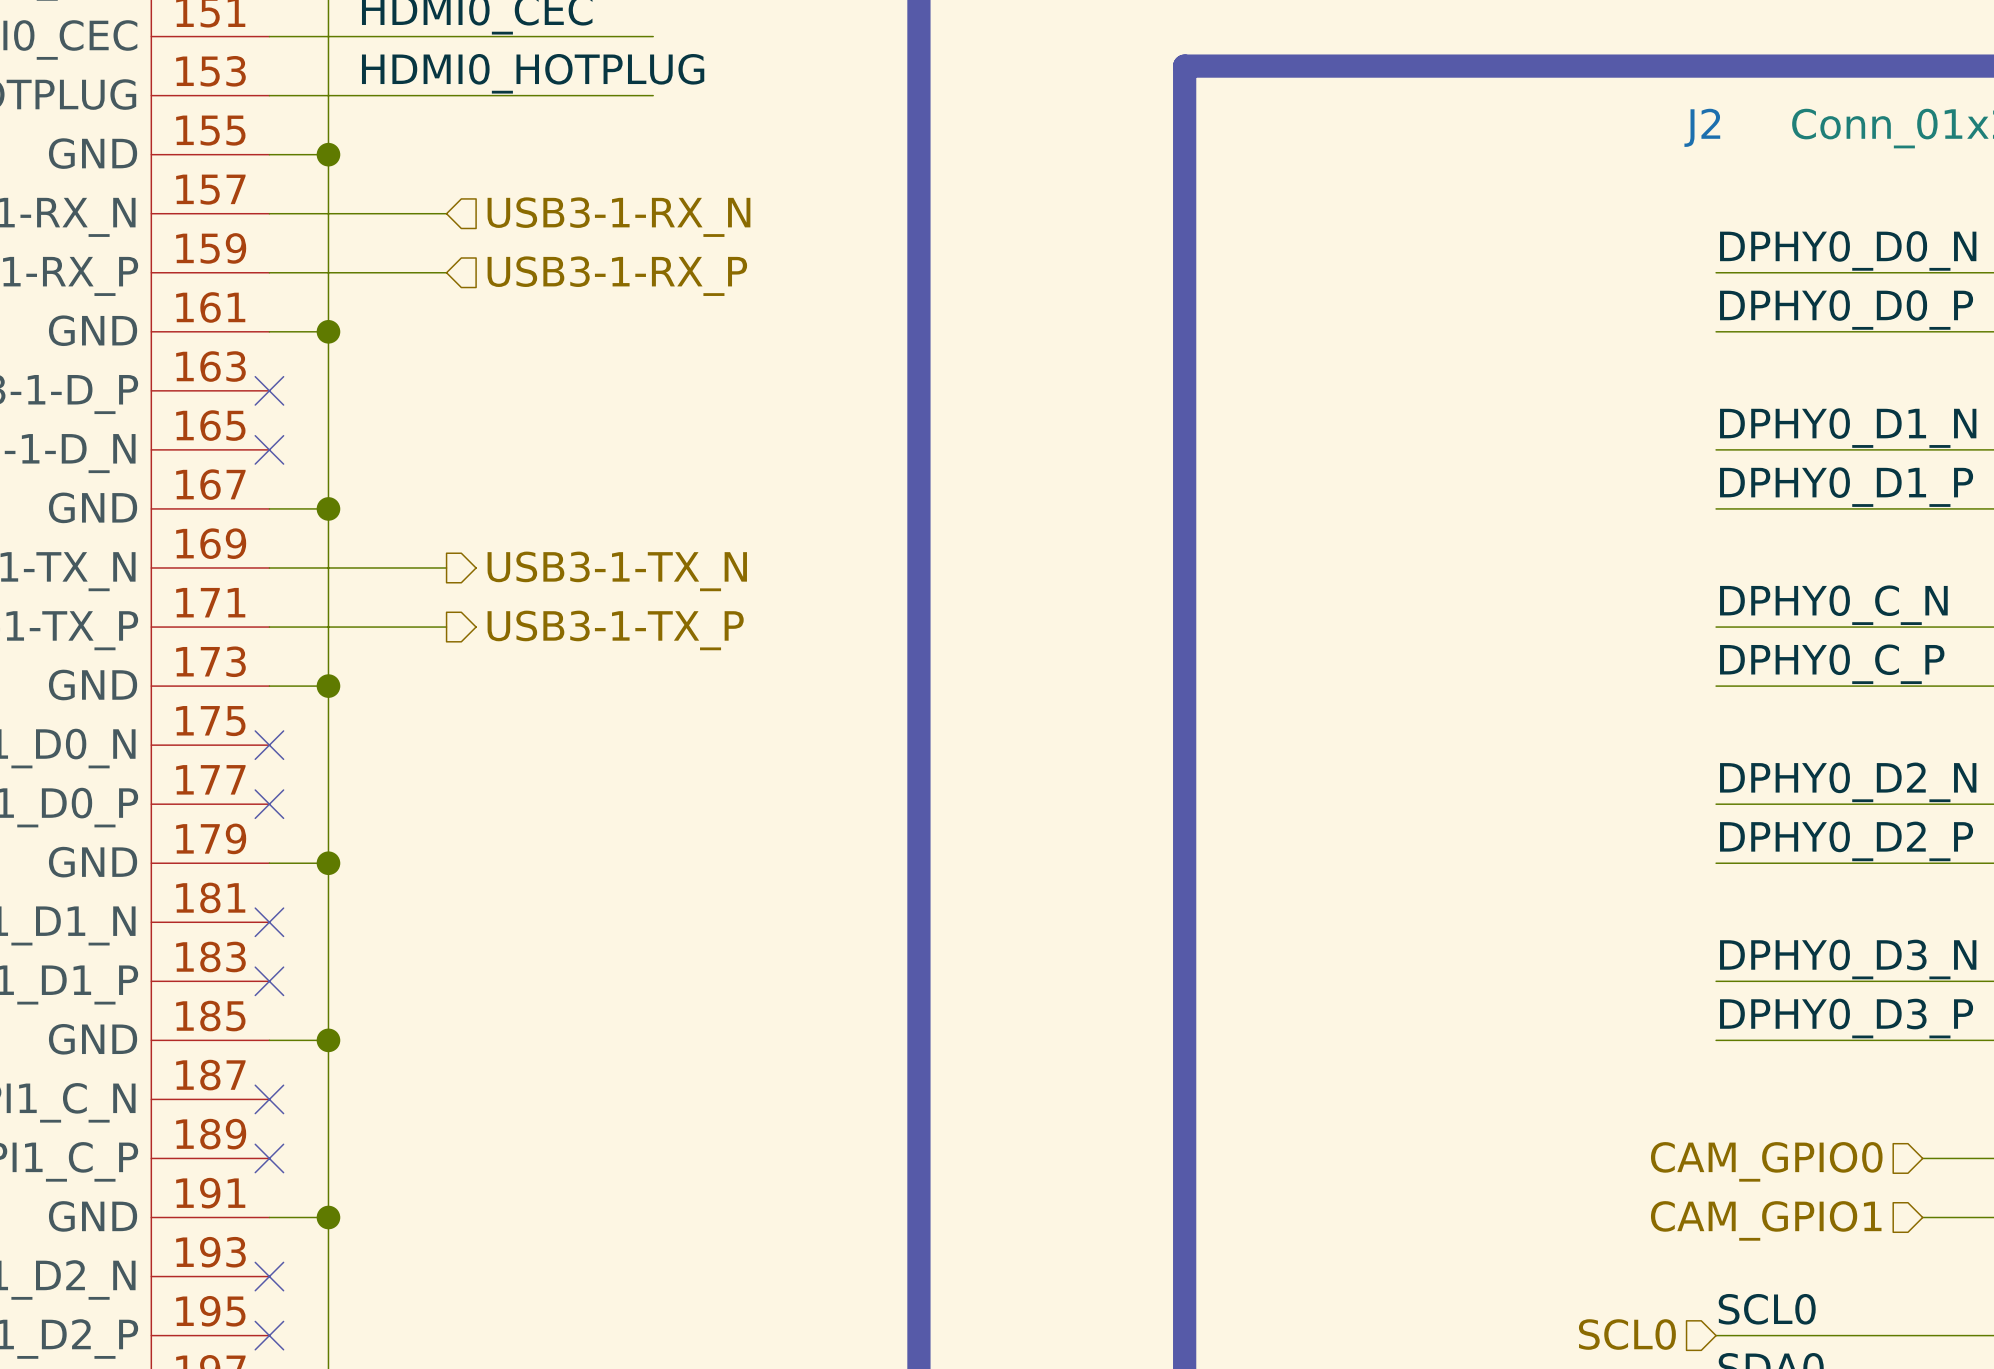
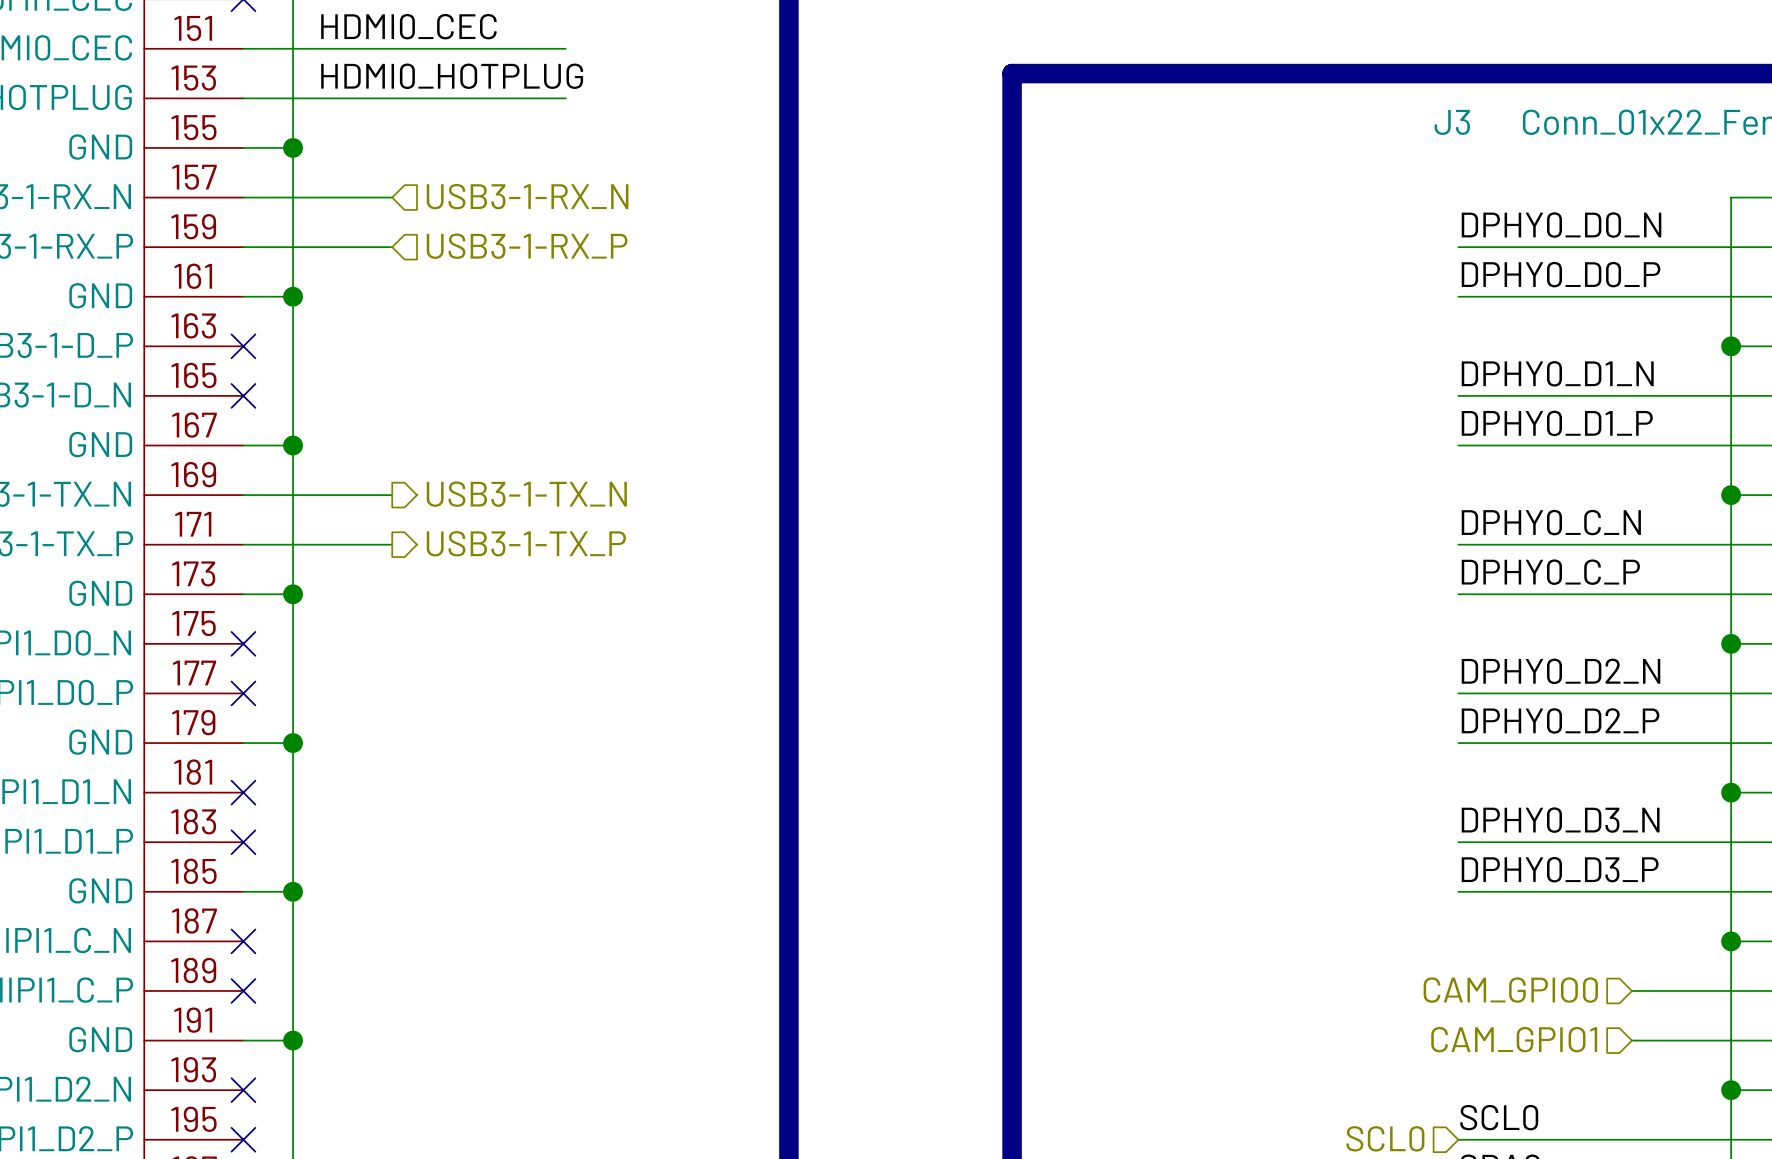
J2 name: J2 (1702, 127) -> J3 (1452, 122)

